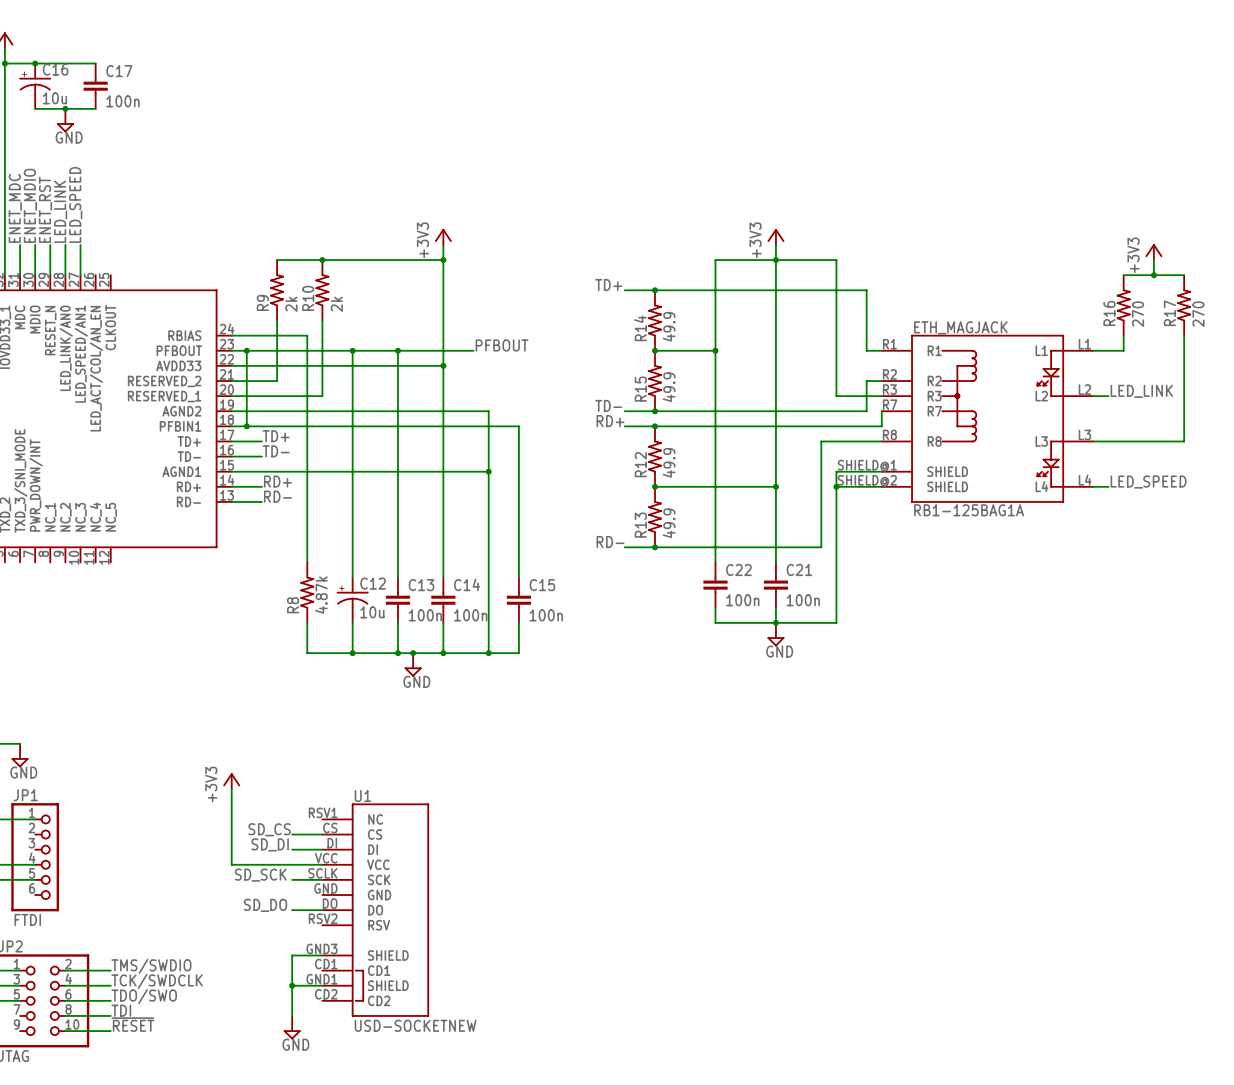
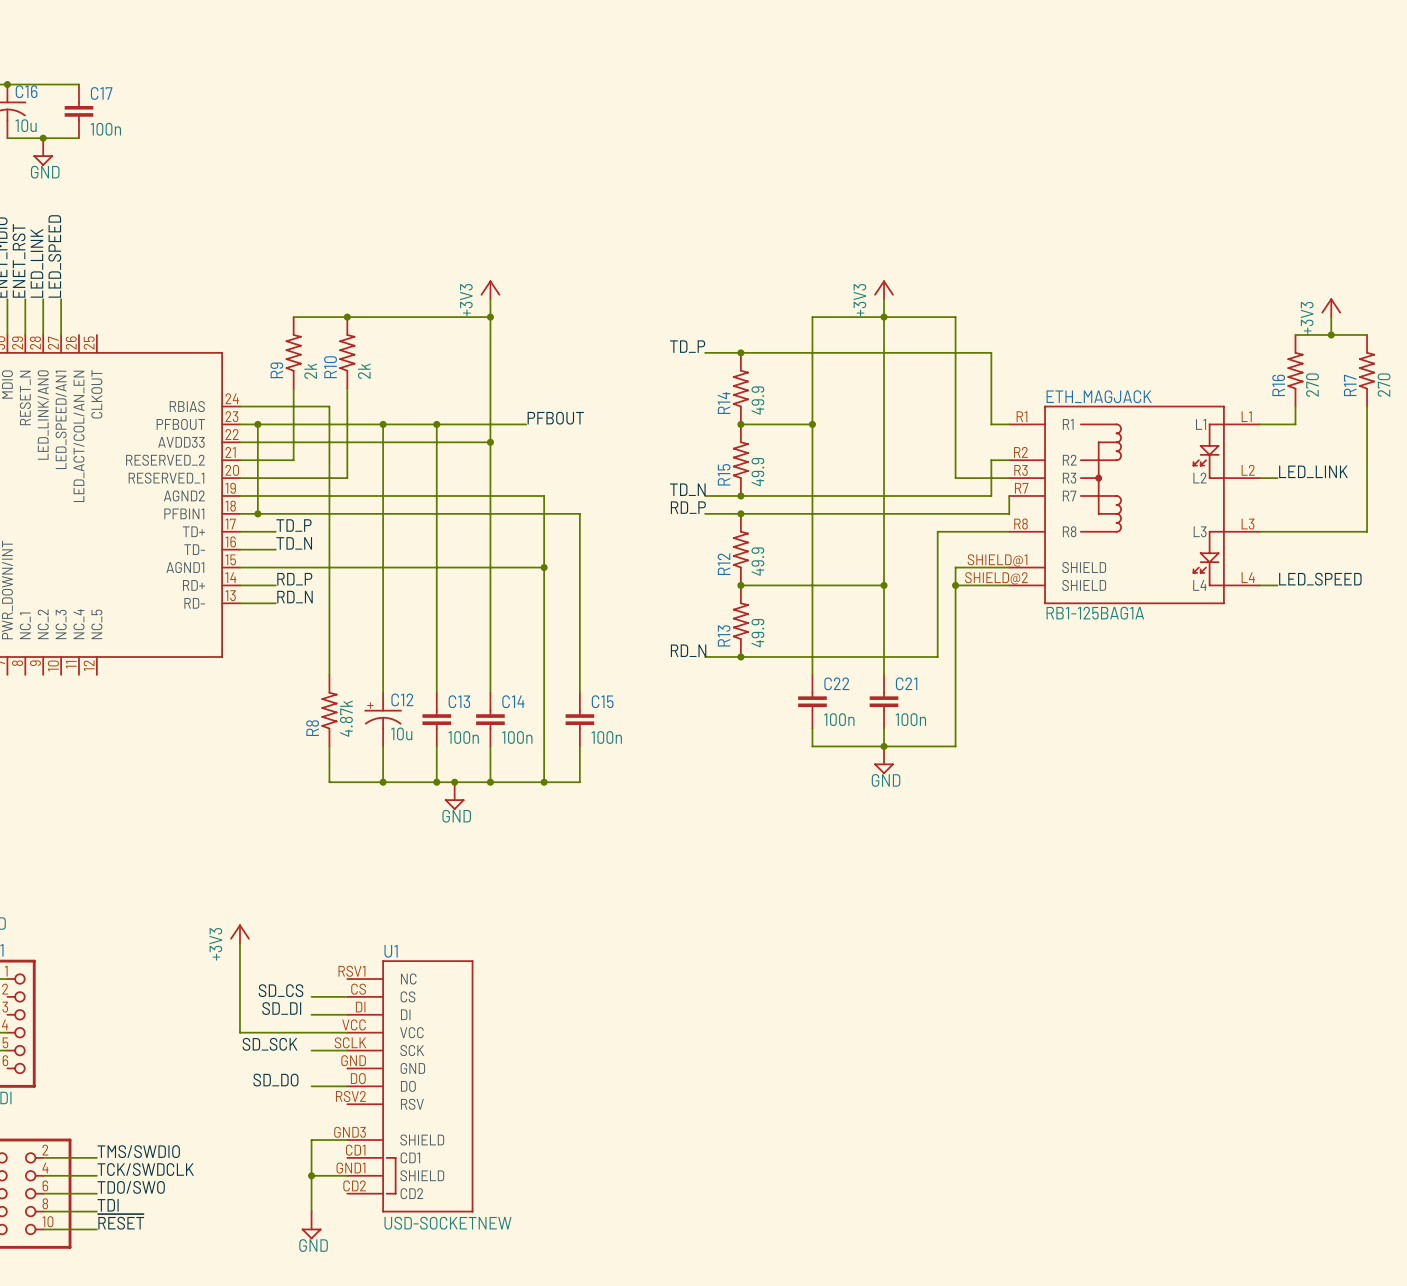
label: TD+ (608, 285) -> TD_P (687, 346)
label: TD- (608, 405) -> TD_N (687, 489)
label: RD+ (610, 421) -> RD_P (688, 507)
label: TD+ (276, 436) -> TD_P (294, 525)
label: TD- (276, 451) -> TD_N (294, 543)
label: RD+ (277, 481) -> RD_P (294, 579)
label: RD- (277, 496) -> RD_N (295, 597)
label: RD- (610, 542) -> RD_N (688, 650)

